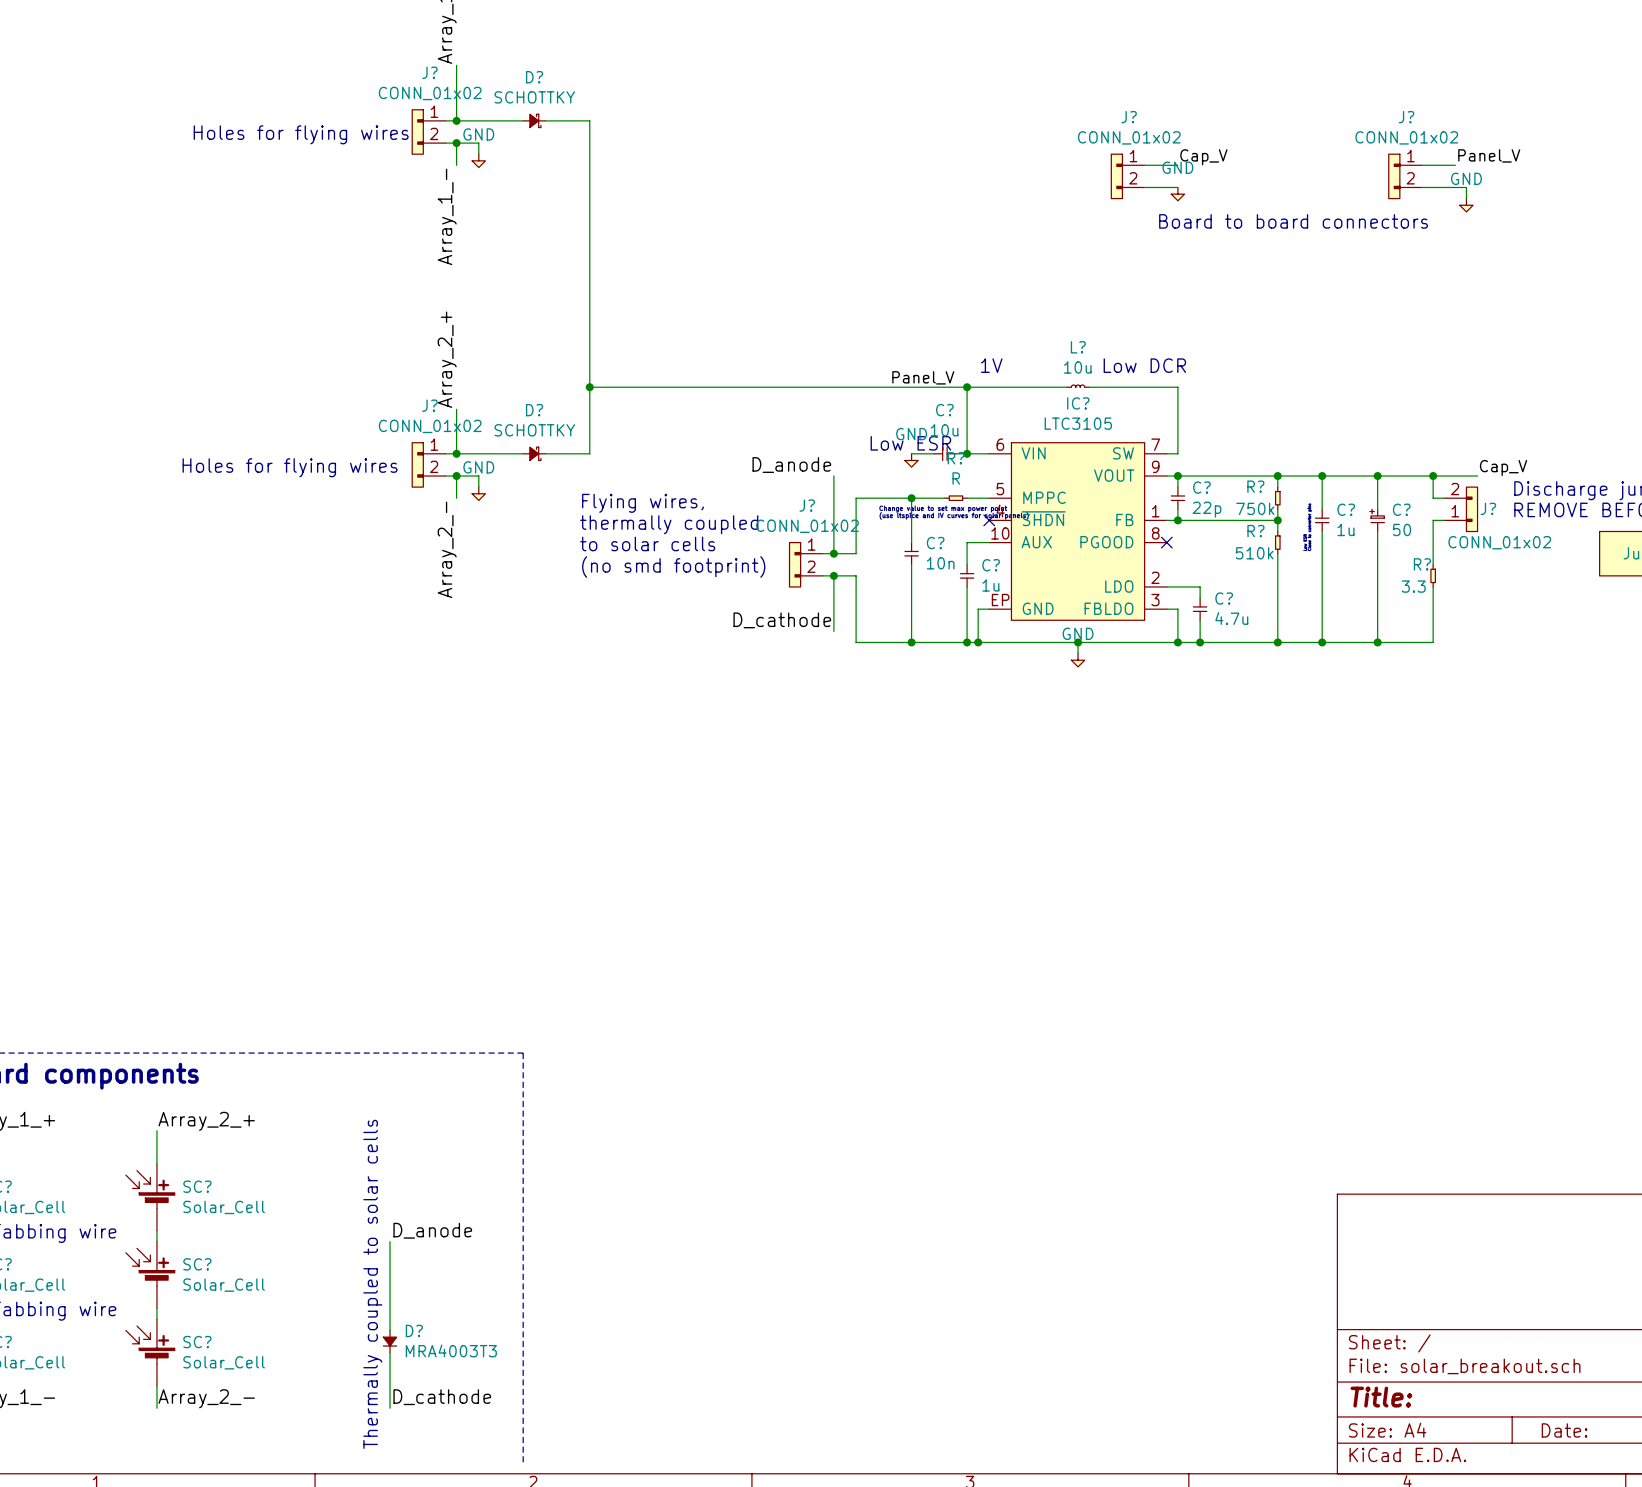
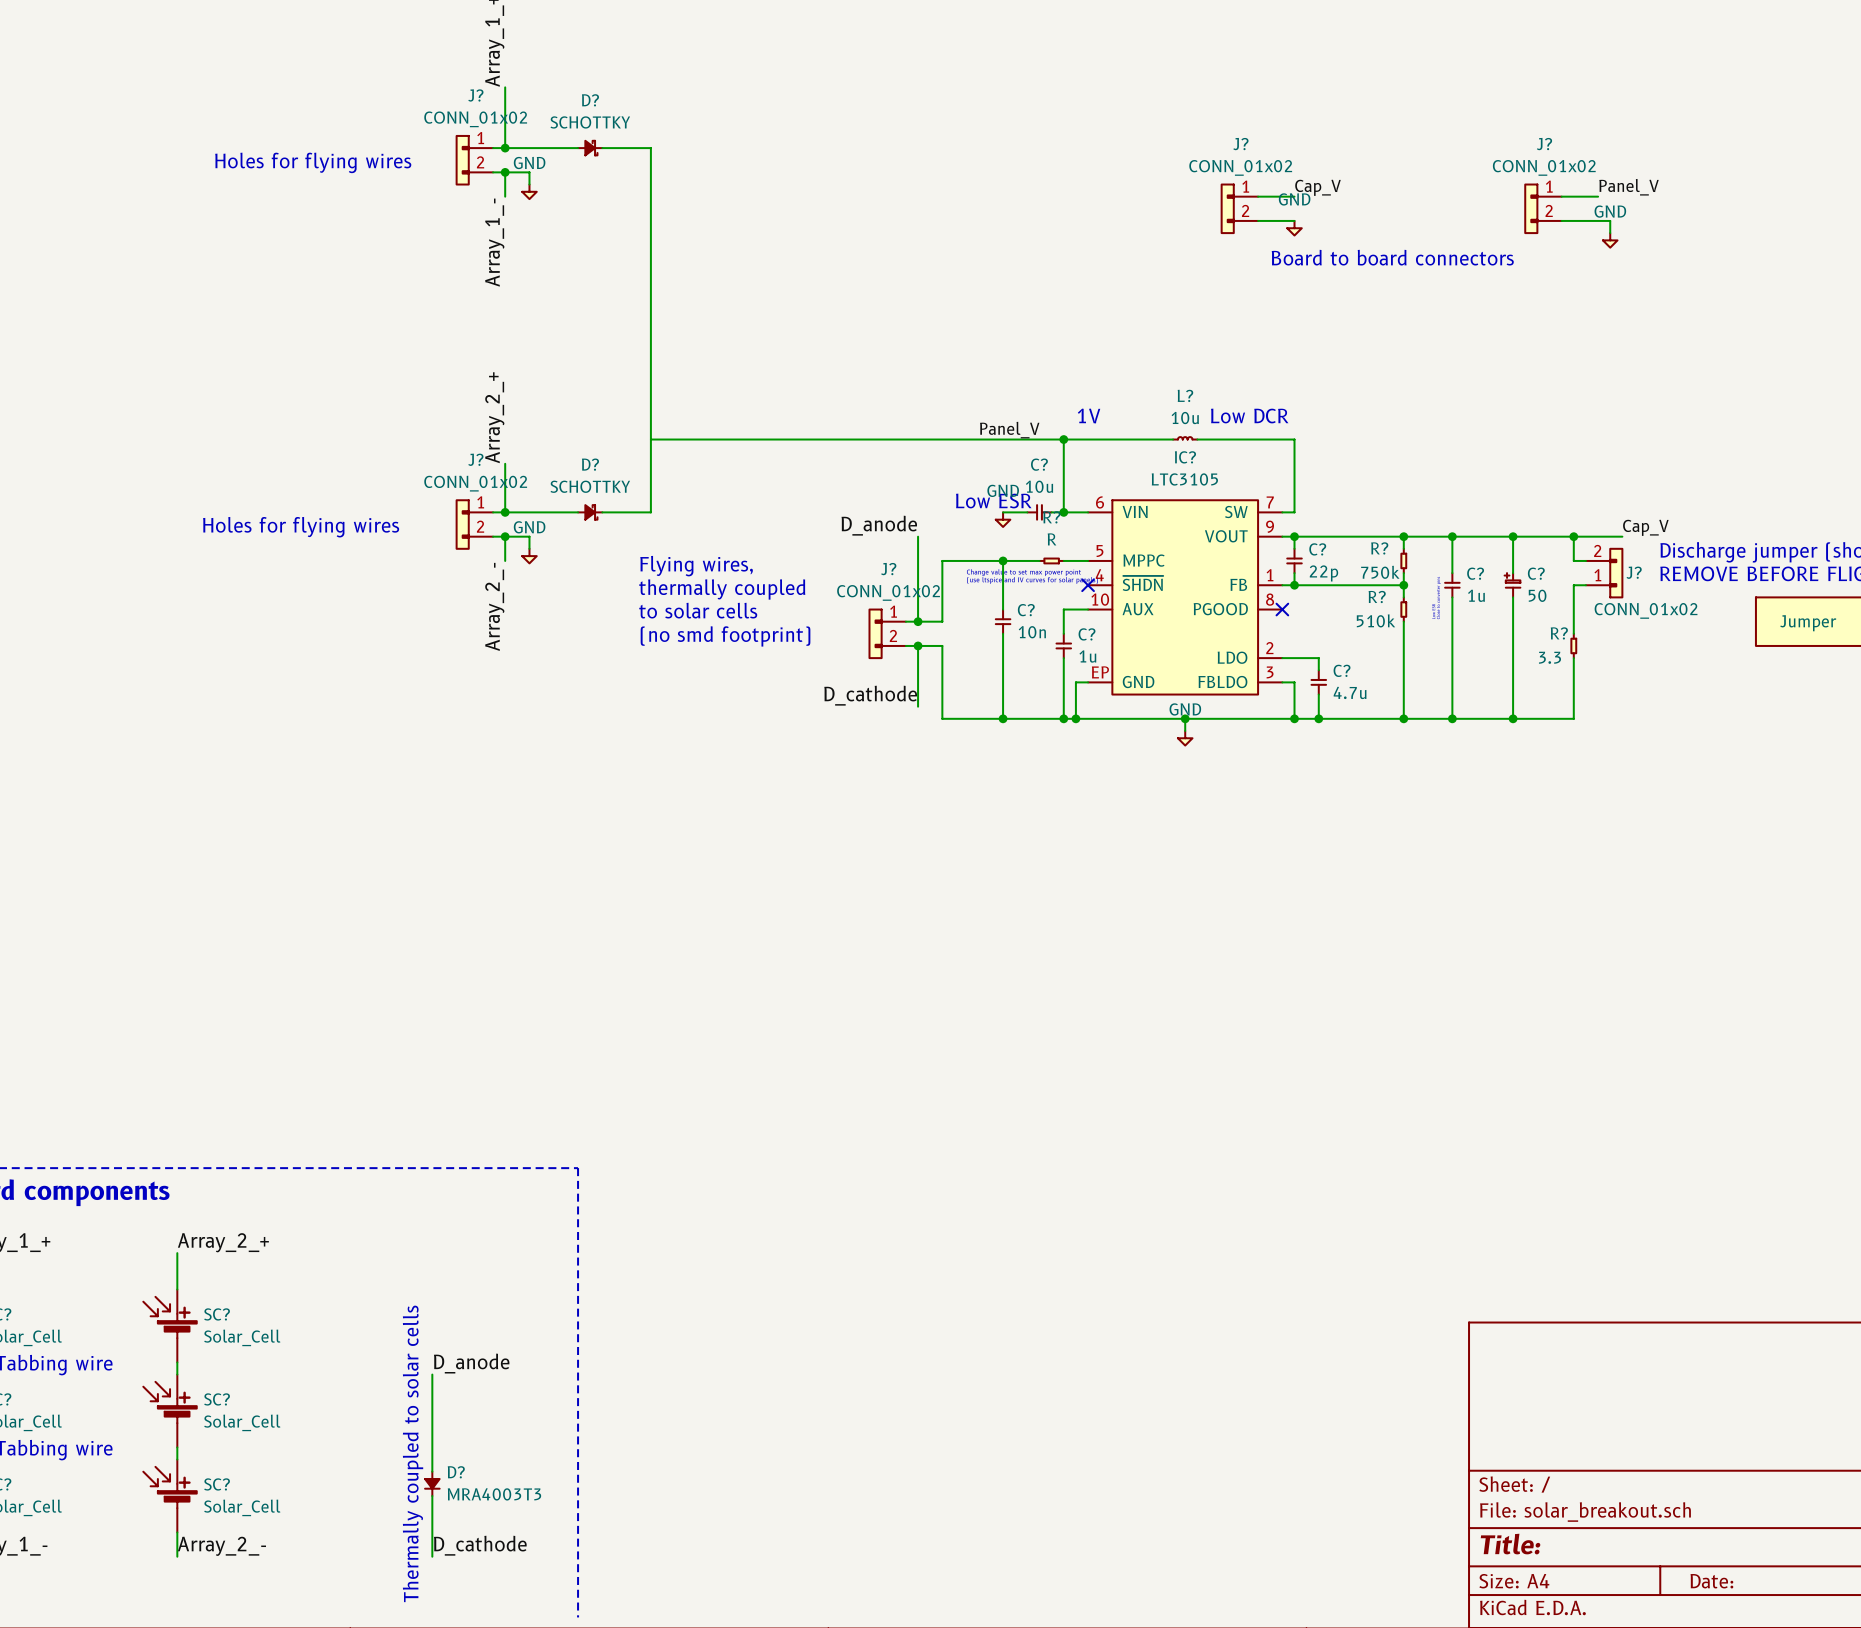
junction: (589, 387) -> none

